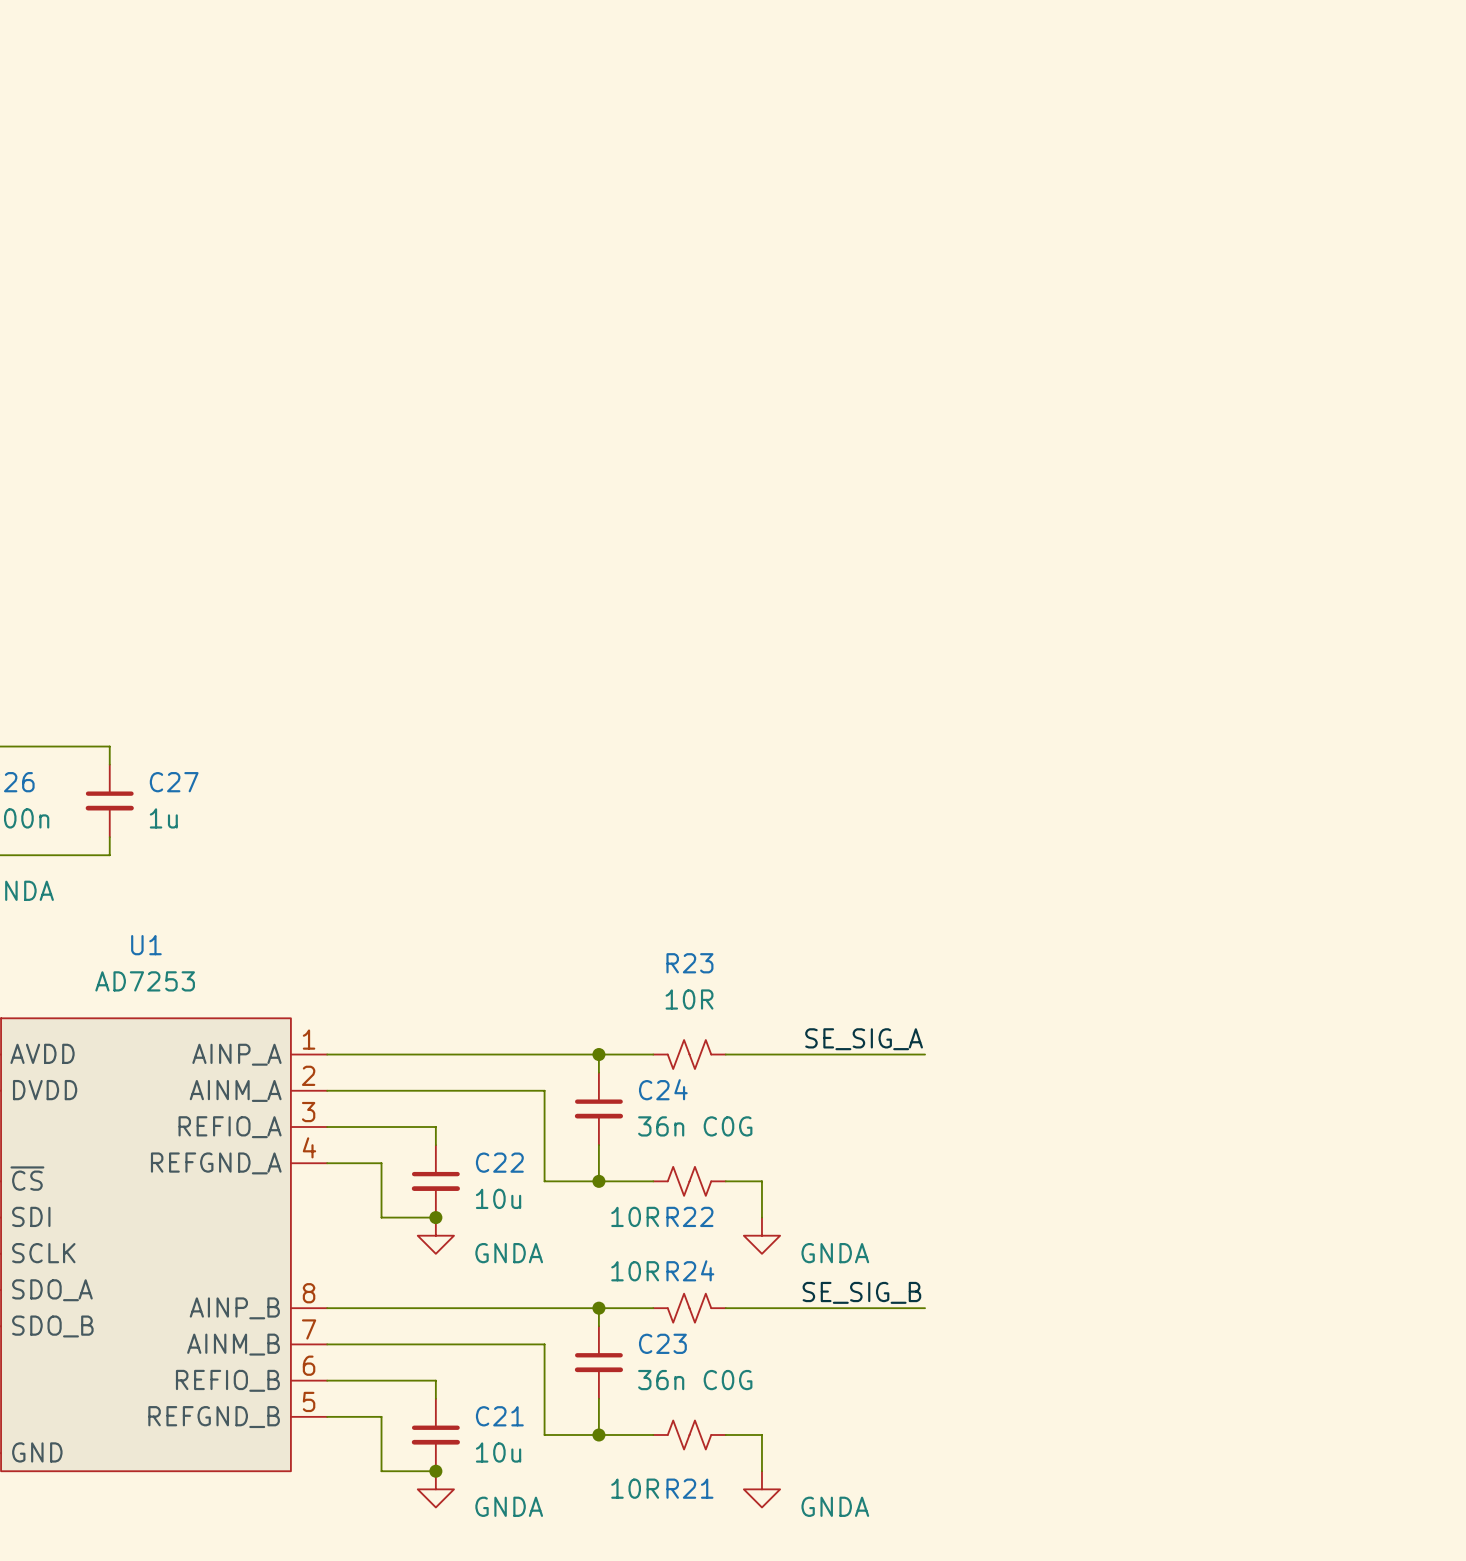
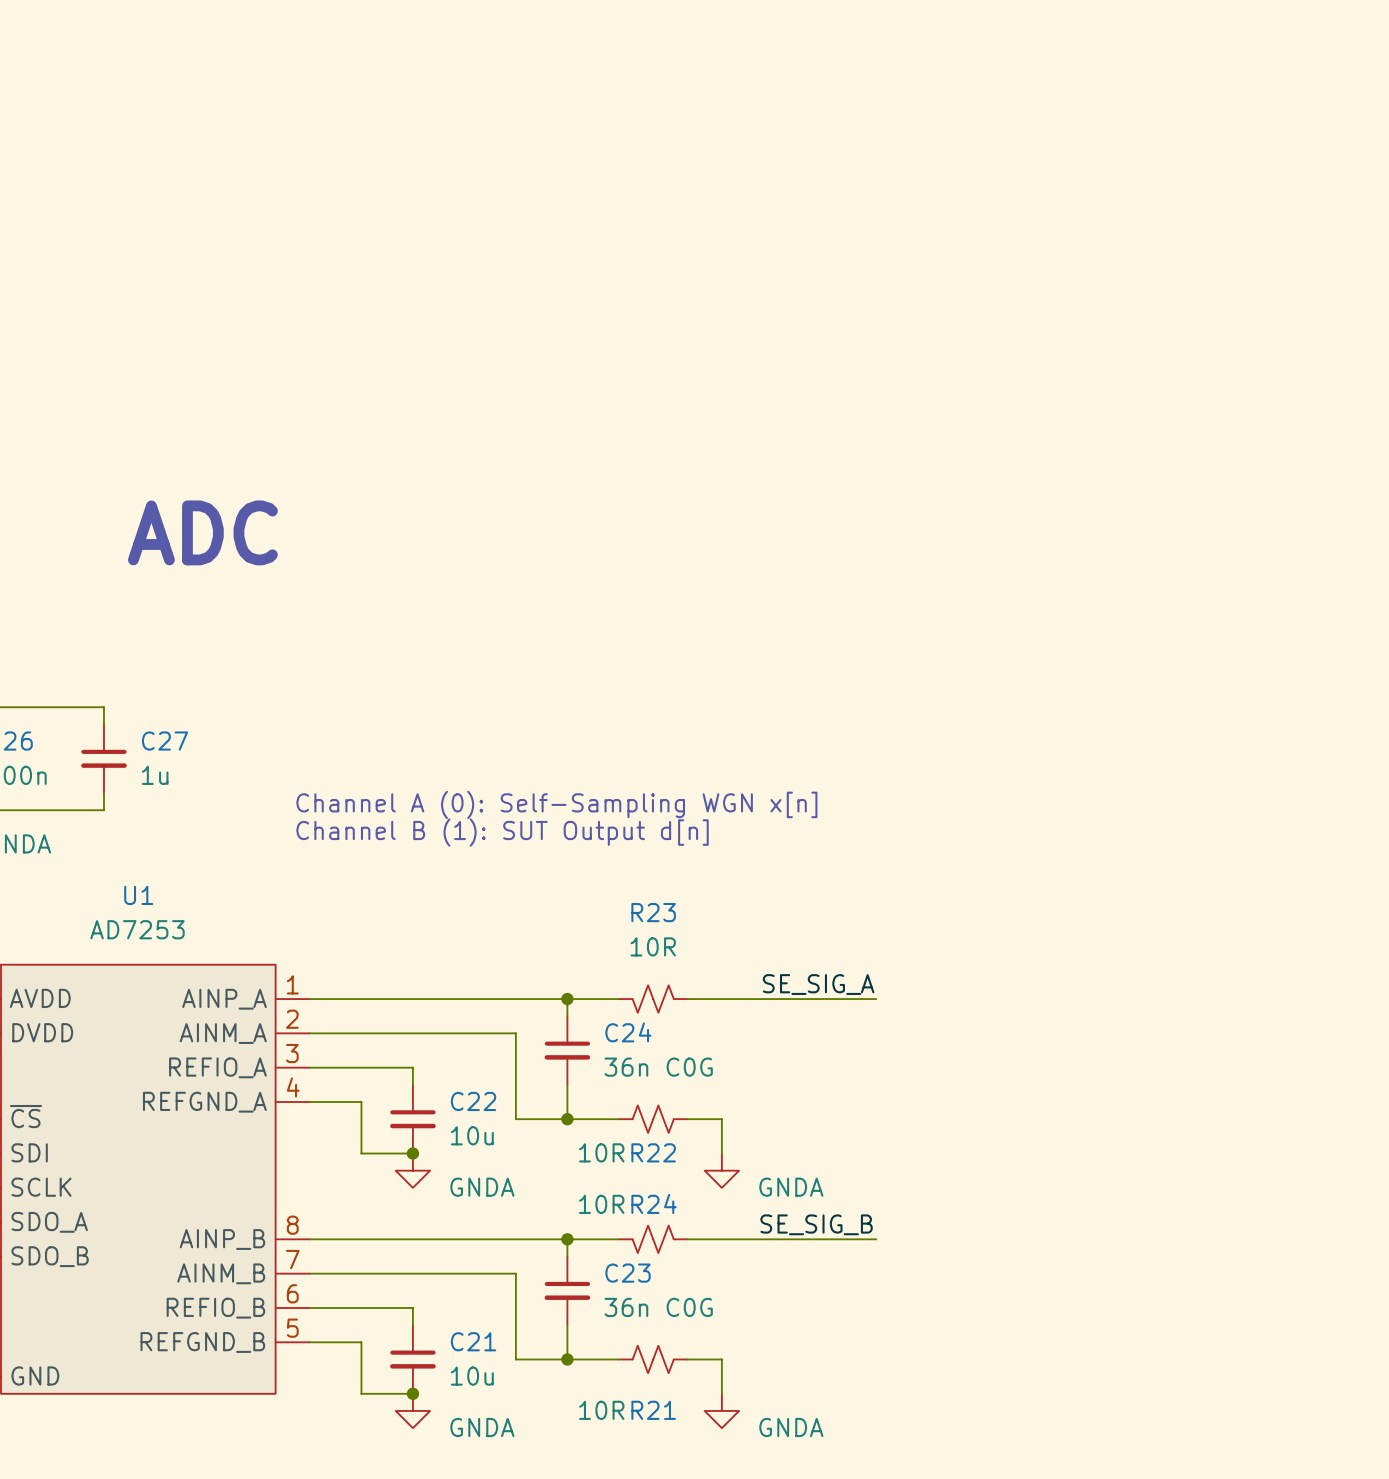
text: none -> ADC (202, 532)
text: none -> Channel A (0): Self-Sampling WGN x[n] (556, 804)
text: none -> Channel B (1): SUT Output d[n] (502, 832)

